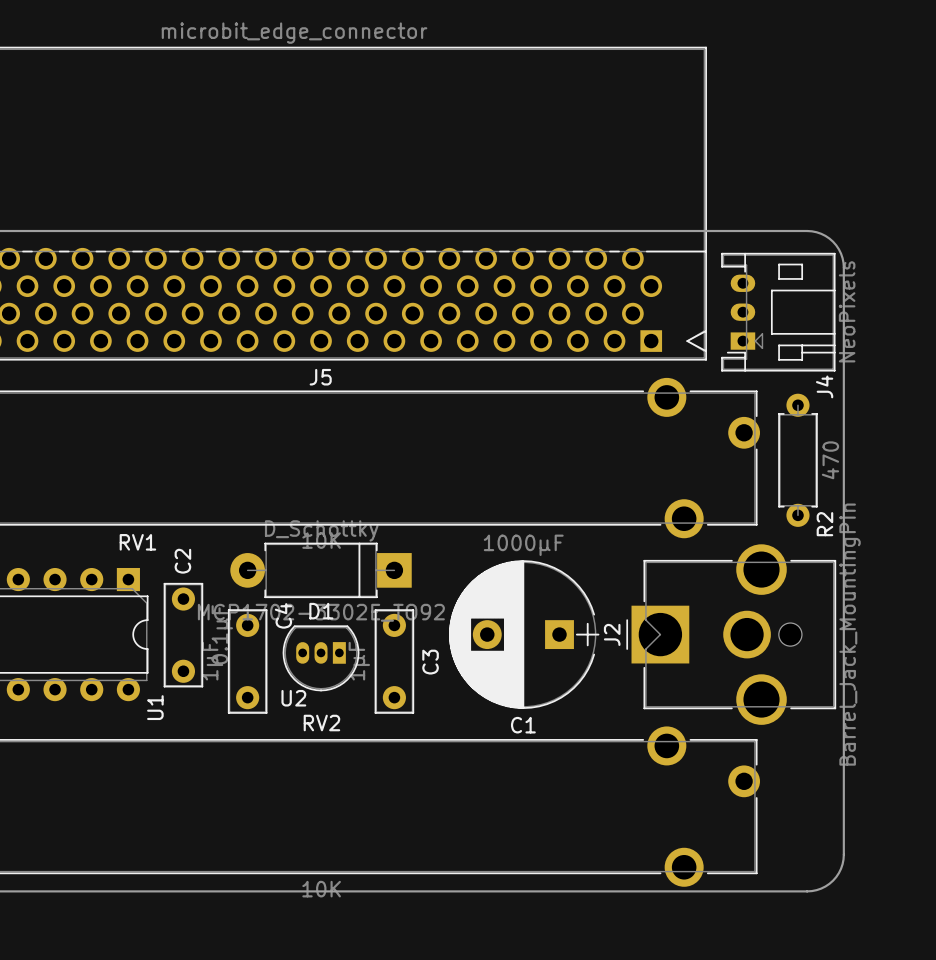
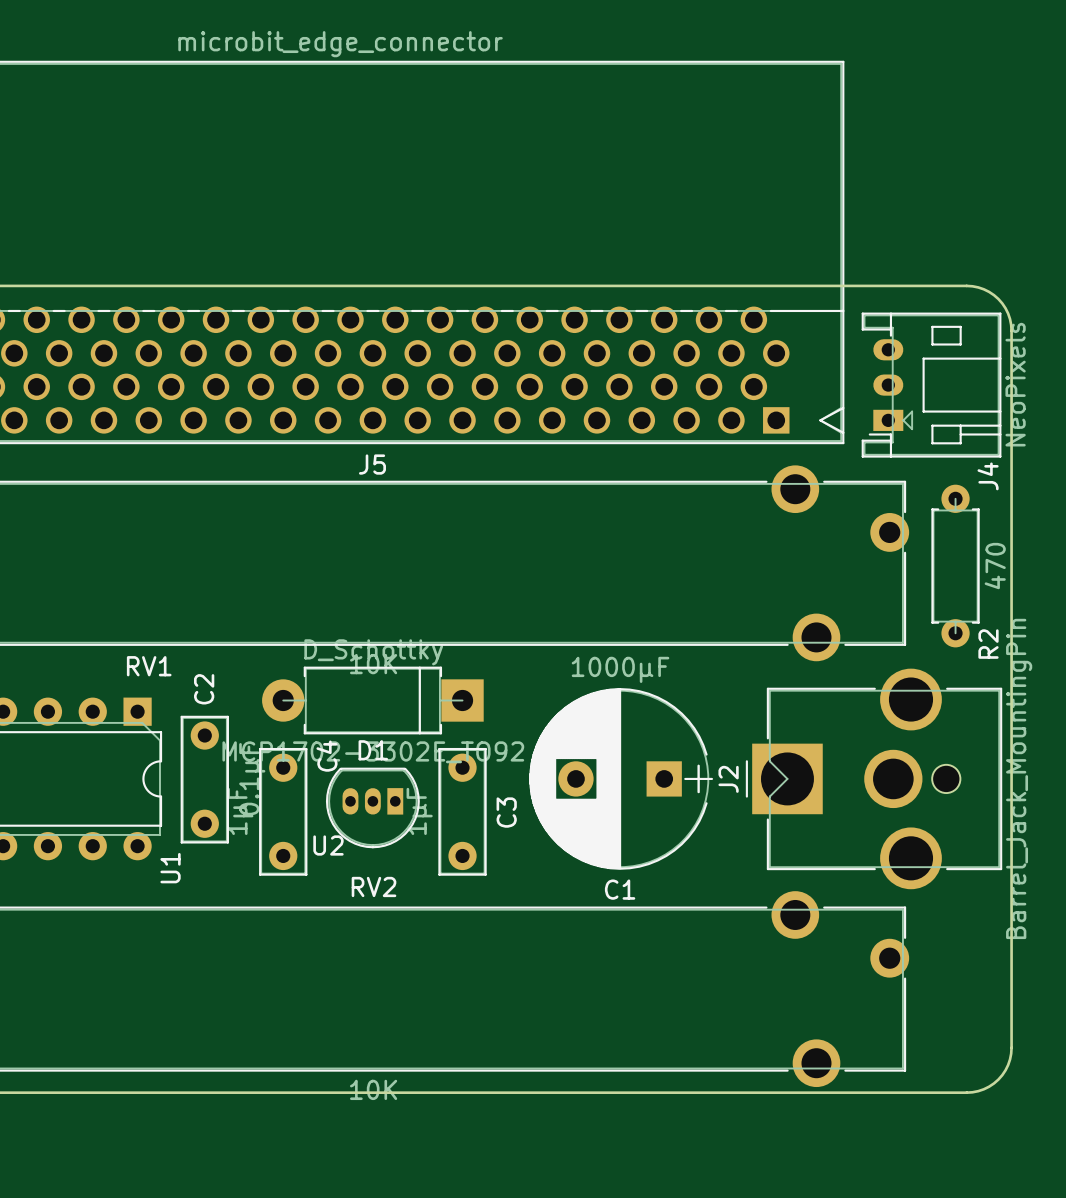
U2 name position: U2 (293, 698) -> U2 (328, 845)

